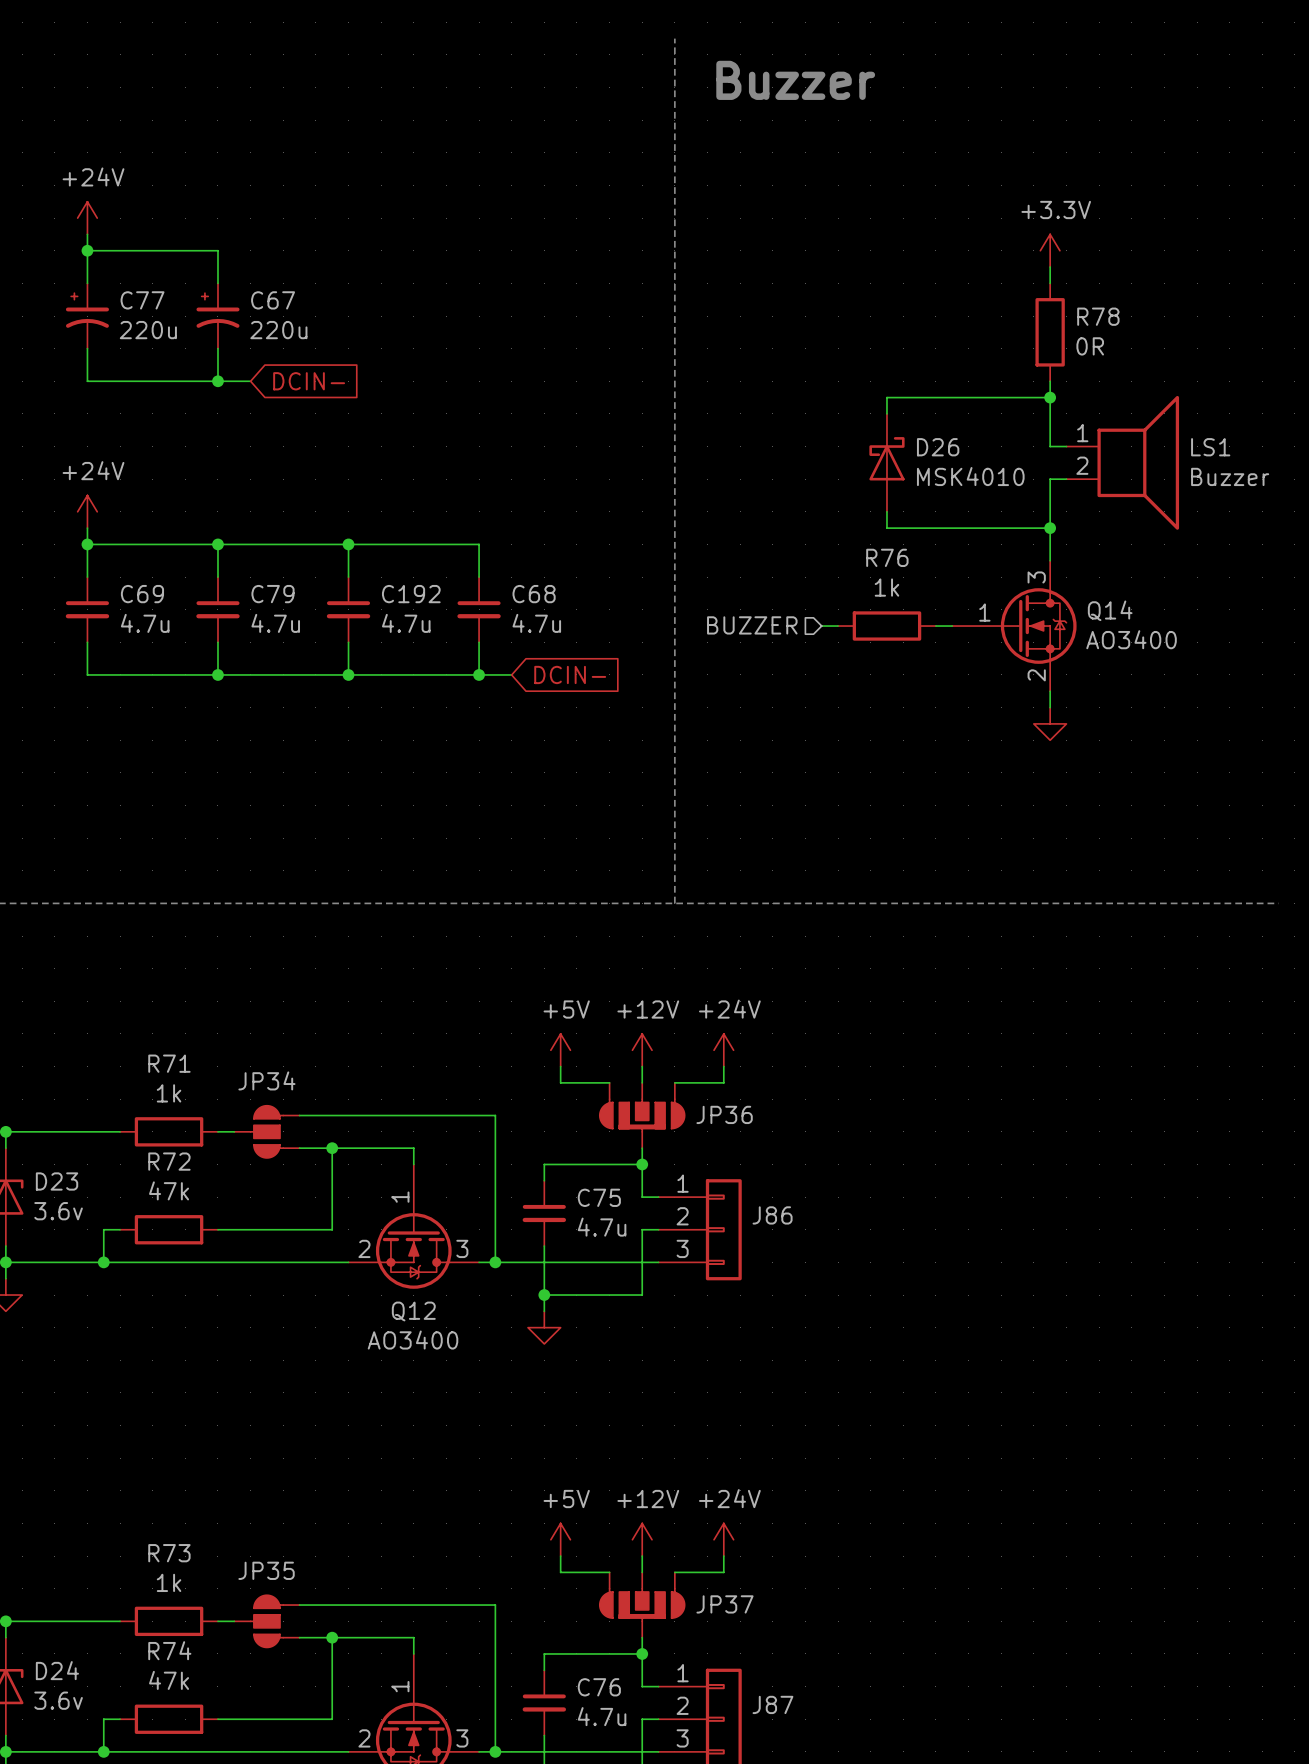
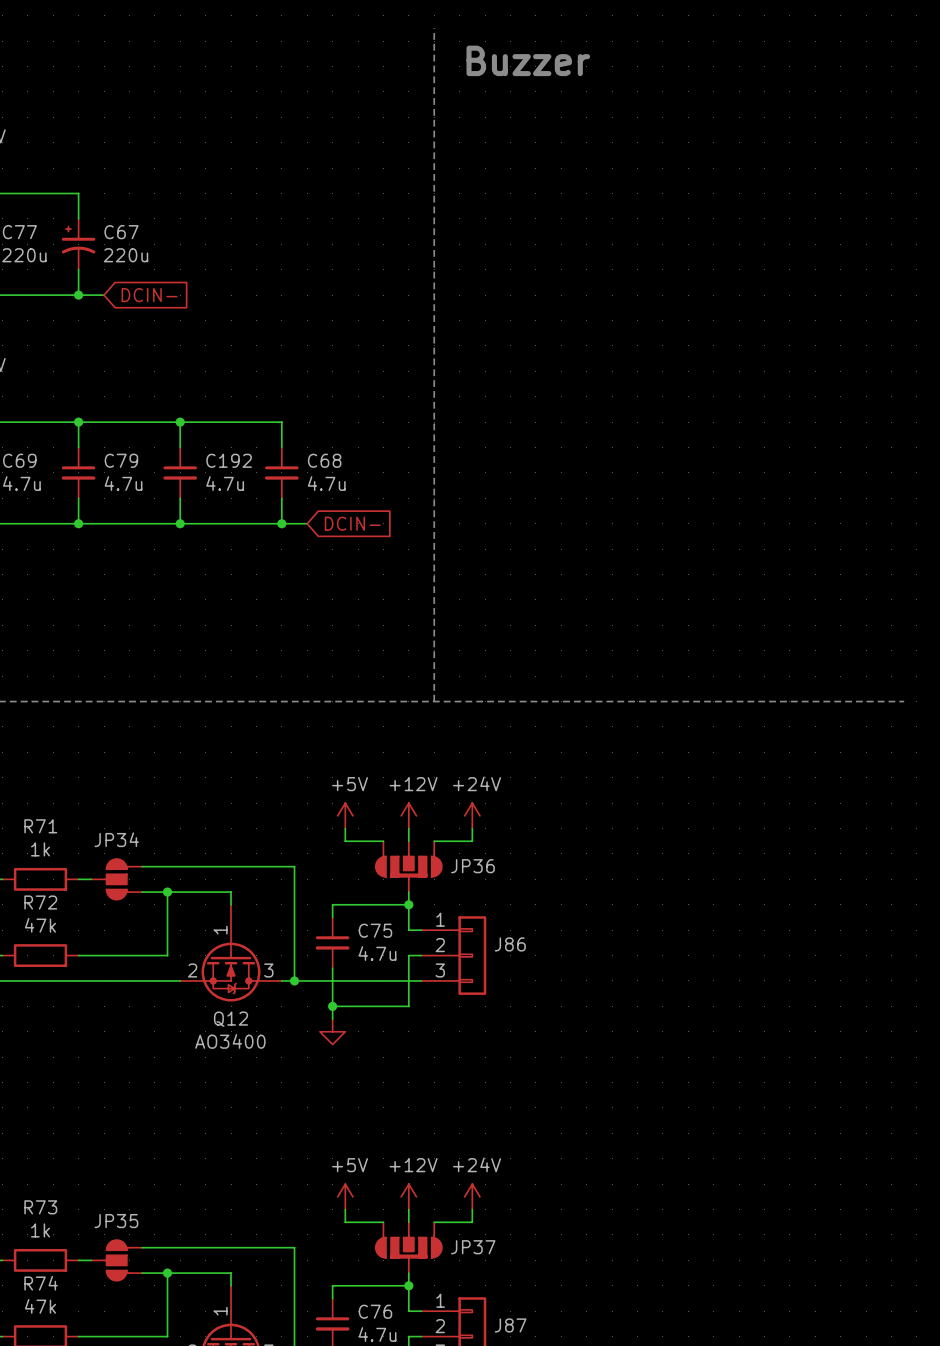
power symbol: +3.3V (1050, 250) -> none
wire: (1050, 267) (1050, 283) -> none
R78: 0R (1050, 332) -> none
wire: (1050, 381) (1050, 446) (1066, 446) -> none
wire: (1050, 397) (886, 397) (886, 413) -> none
junction: (1050, 397) -> none
D26: MSK4010 (886, 462) -> none
LS1: Buzzer (1122, 462) -> none
wire: (1066, 479) (1050, 479) (1050, 560) -> none
wire: (886, 511) (886, 528) (1050, 528) -> none
junction: (1050, 528) -> none
hierarchical label: BUZZER (752, 625) -> none
wire: (821, 626) (838, 626) -> none
R76: 1k (886, 626) -> none
wire: (935, 626) (952, 626) -> none
Q14: AO3400 (1014, 626) -> none
wire: (1050, 691) (1050, 707) -> none
power symbol: (1050, 723) -> none

